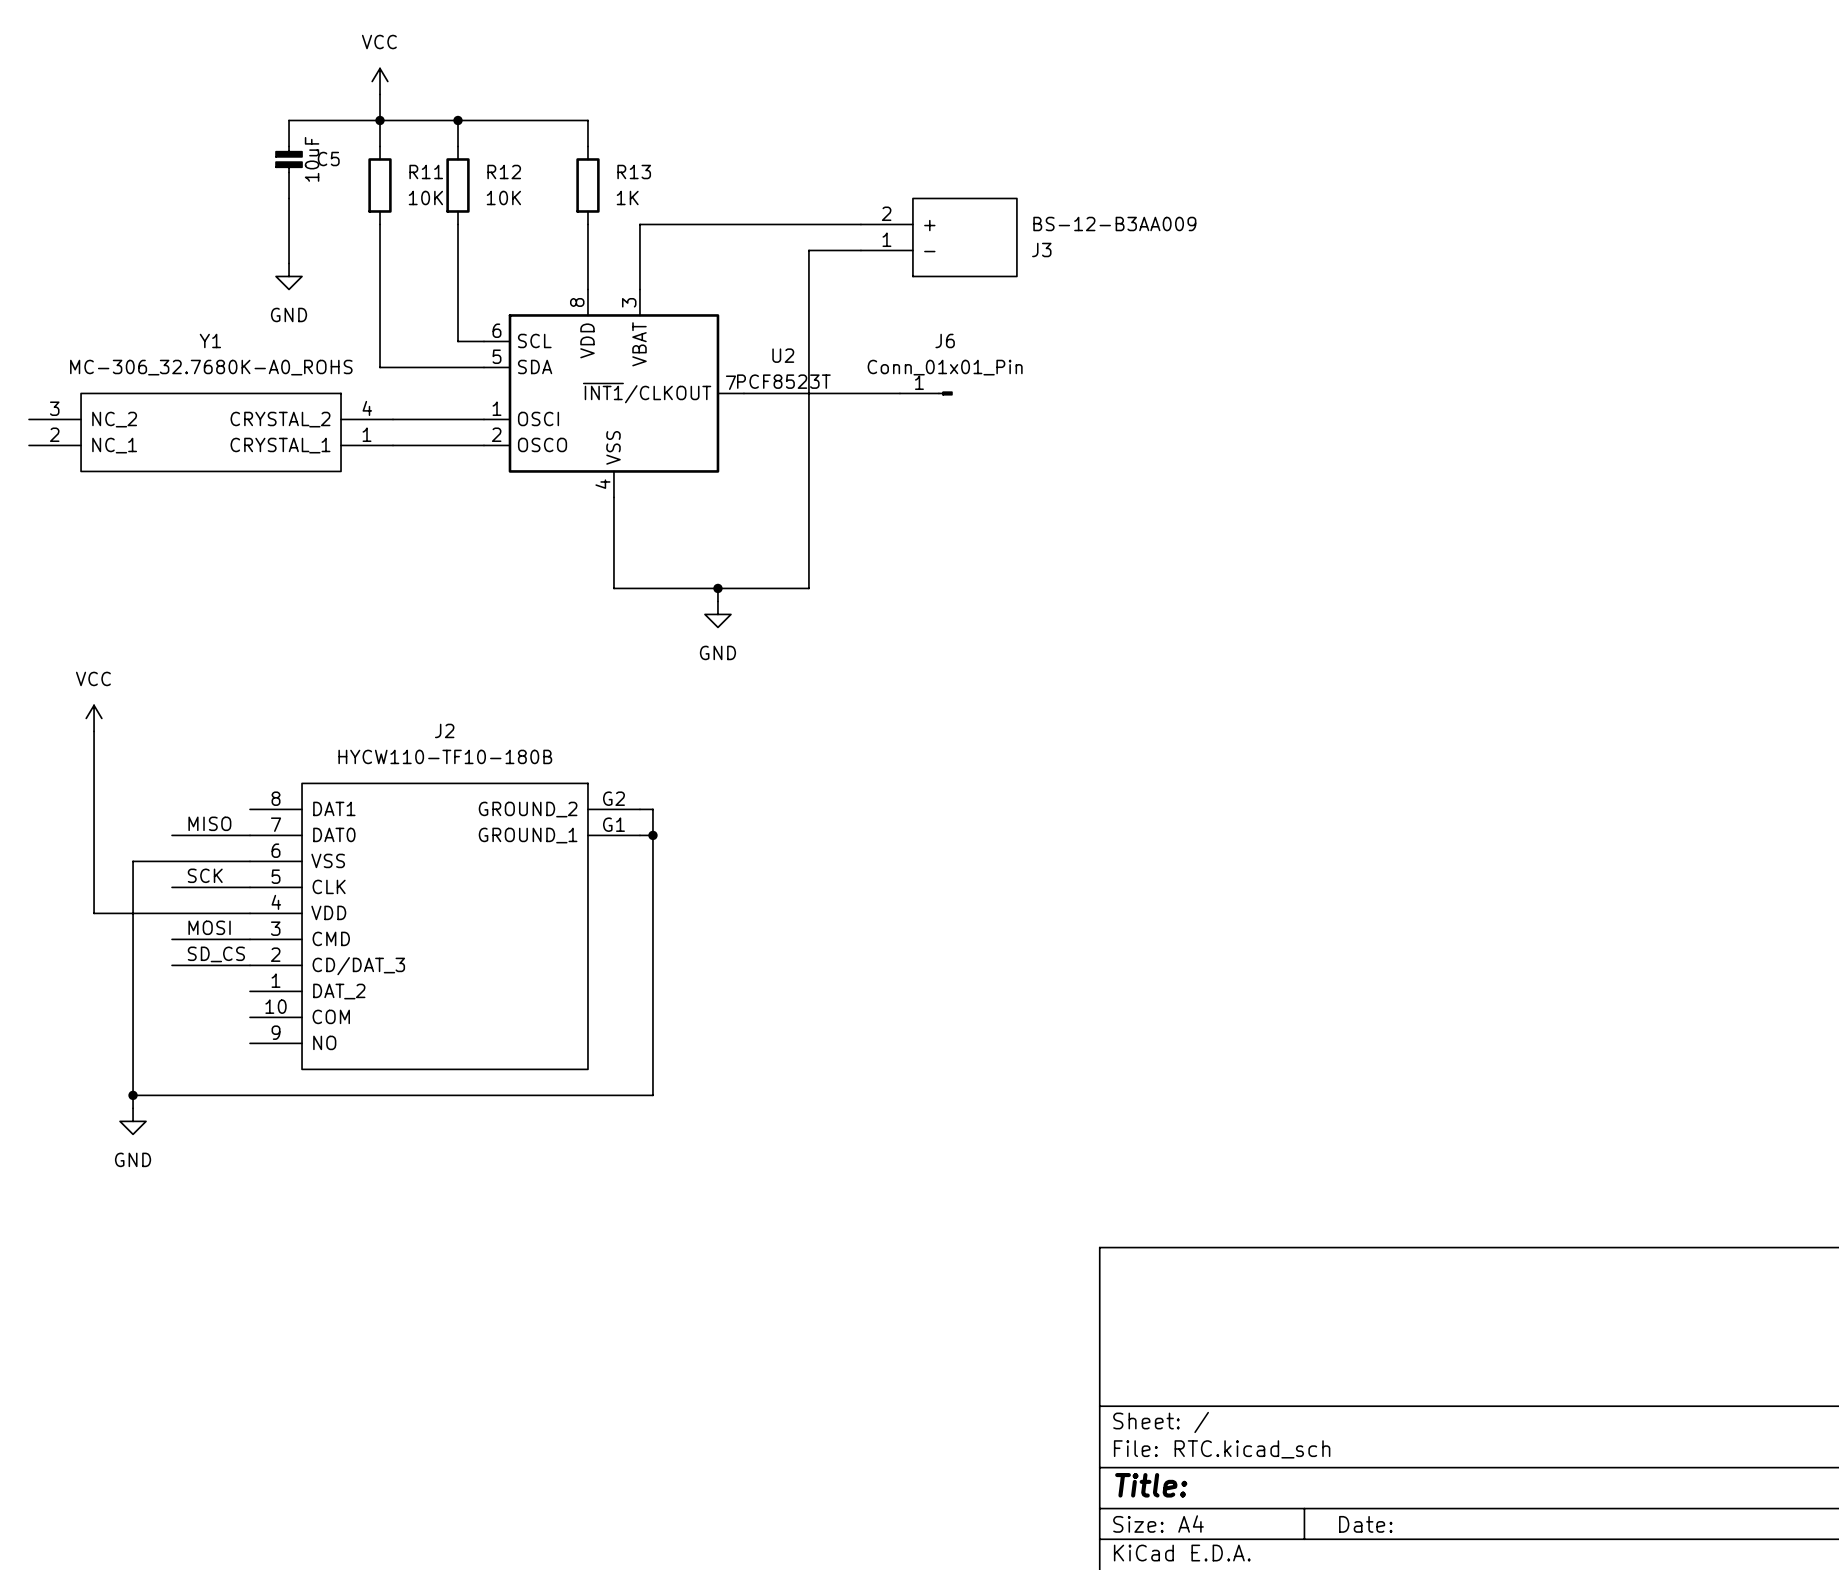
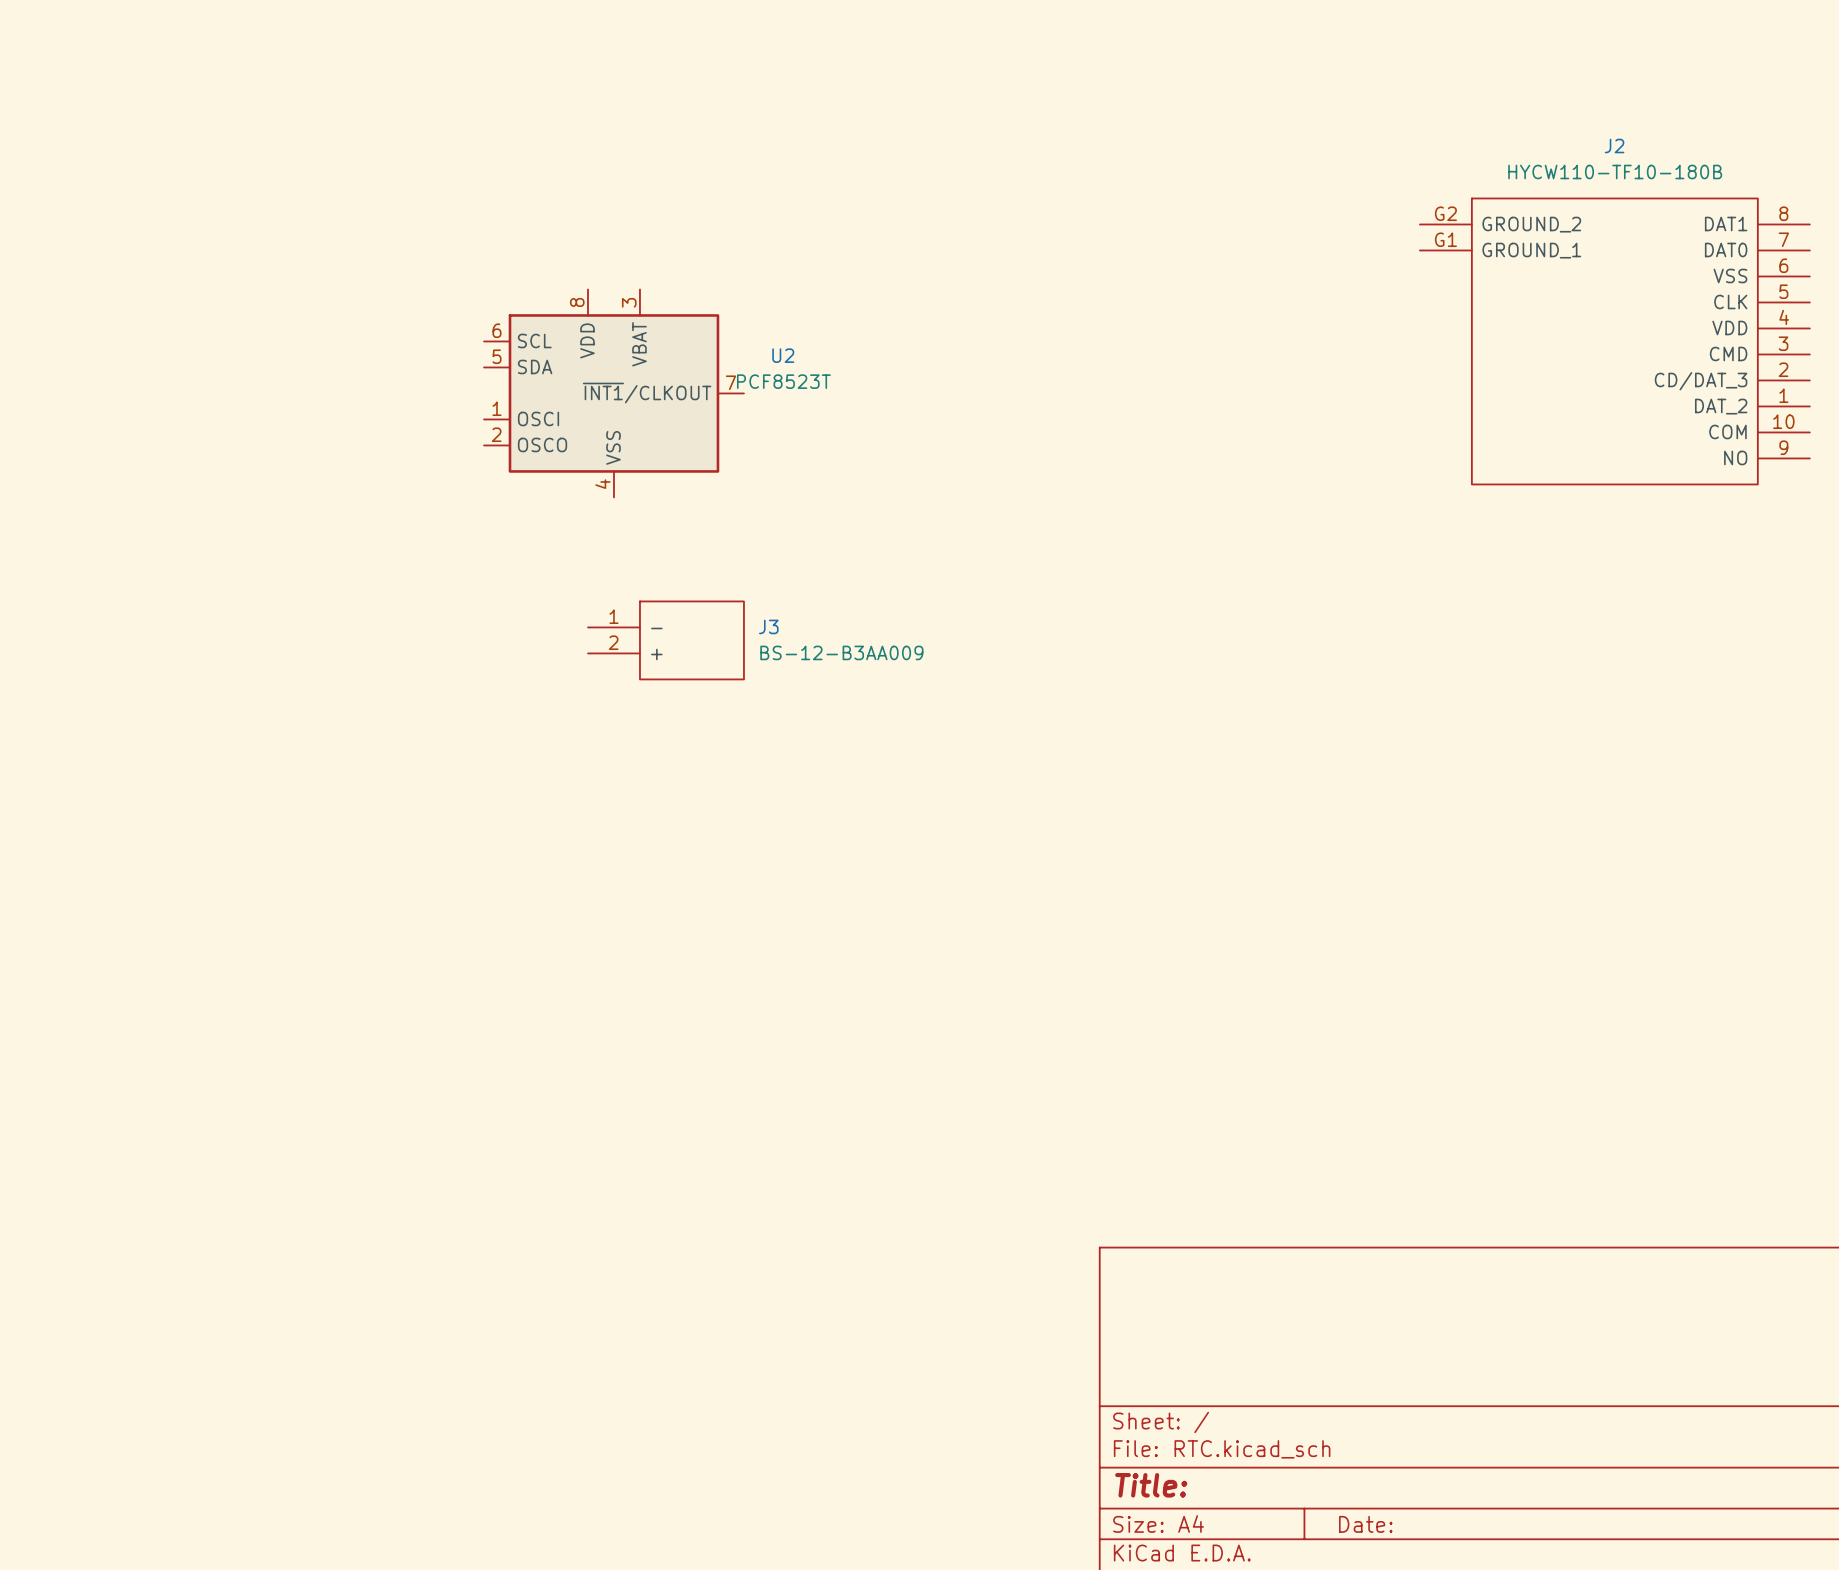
power symbol: VCC (380, 81) -> none
wire: (380, 94) (380, 146) -> none
wire: (289, 120) (587, 120) (587, 146) -> none
junction: (380, 120) -> none
wire: (458, 120) (458, 146) -> none
junction: (458, 120) -> none
C5: 10uF (289, 159) -> none
R11: 10K (380, 185) -> none
R12: 10K (458, 185) -> none
R13: 1K (587, 185) -> none
wire: (289, 198) (289, 263) -> none
wire: (380, 224) (380, 367) (483, 367) -> none
wire: (458, 224) (458, 341) (483, 341) -> none
wire: (587, 224) (587, 289) -> none
wire: (860, 224) (639, 224) (639, 289) -> none
J3 position: (939, 237) -> (666, 640)
J3 flip: as is (964, 237) -> up-down (691, 640)
wire: (860, 250) (808, 250) (808, 588) (613, 588) (613, 497) -> none
power symbol: GND (289, 276) -> none
wire: (743, 393) (899, 393) -> none
J6: Conn_01x01_Pin (926, 393) -> none
wire: (393, 419) (483, 419) -> none
Y1: MC-306_32.7680K-A0_ROHS (211, 432) -> none
wire: (393, 445) (483, 445) -> none
wire: (717, 588) (717, 601) -> none
junction: (717, 588) -> none
power symbol: GND (717, 614) -> none
power symbol: VCC (94, 718) -> none
wire: (94, 731) (94, 913) (250, 913) -> none
wire: (639, 809) (652, 809) (652, 1095) (133, 1095) -> none
label: MISO (209, 823) -> none
wire: (172, 835) (250, 835) -> none
wire: (639, 835) (652, 835) -> none
junction: (652, 835) -> none
wire: (250, 861) (133, 861) (133, 1108) -> none
label: SCK (205, 875) -> none
wire: (172, 887) (250, 887) -> none
J2 flip: as is (445, 926) -> left-right (1614, 341)
J2 position: (445, 926) -> (1614, 341)
label: MOSI (209, 927) -> none
wire: (172, 939) (250, 939) -> none
label: SD_CS (216, 954) -> none
wire: (172, 965) (250, 965) -> none
junction: (133, 1095) -> none
power symbol: GND (133, 1121) -> none

